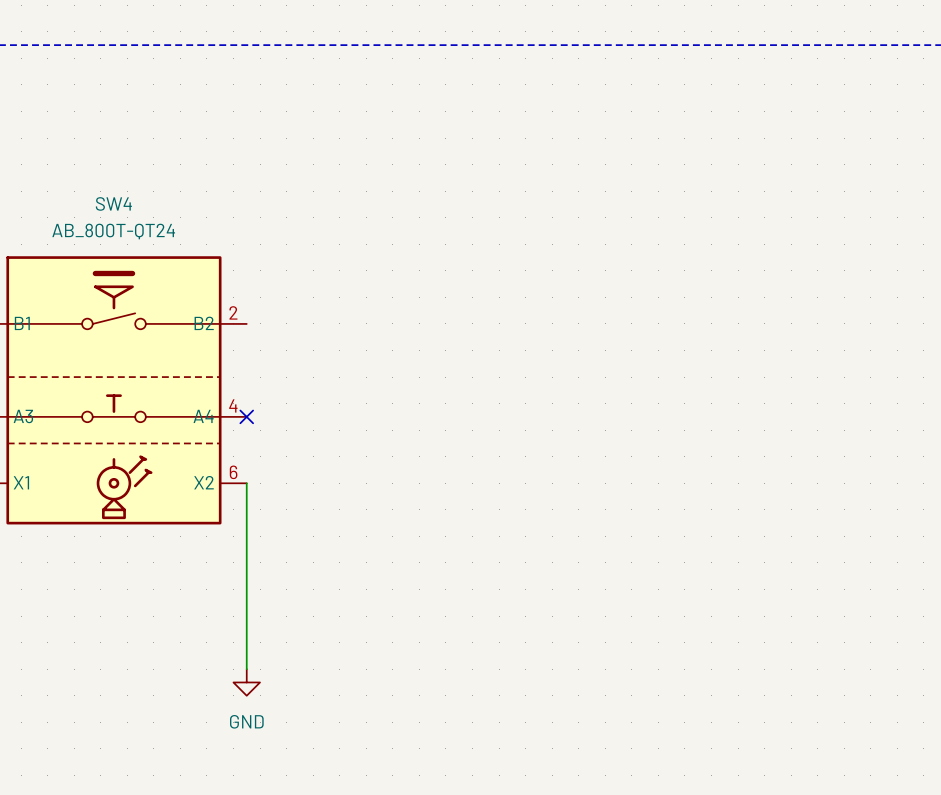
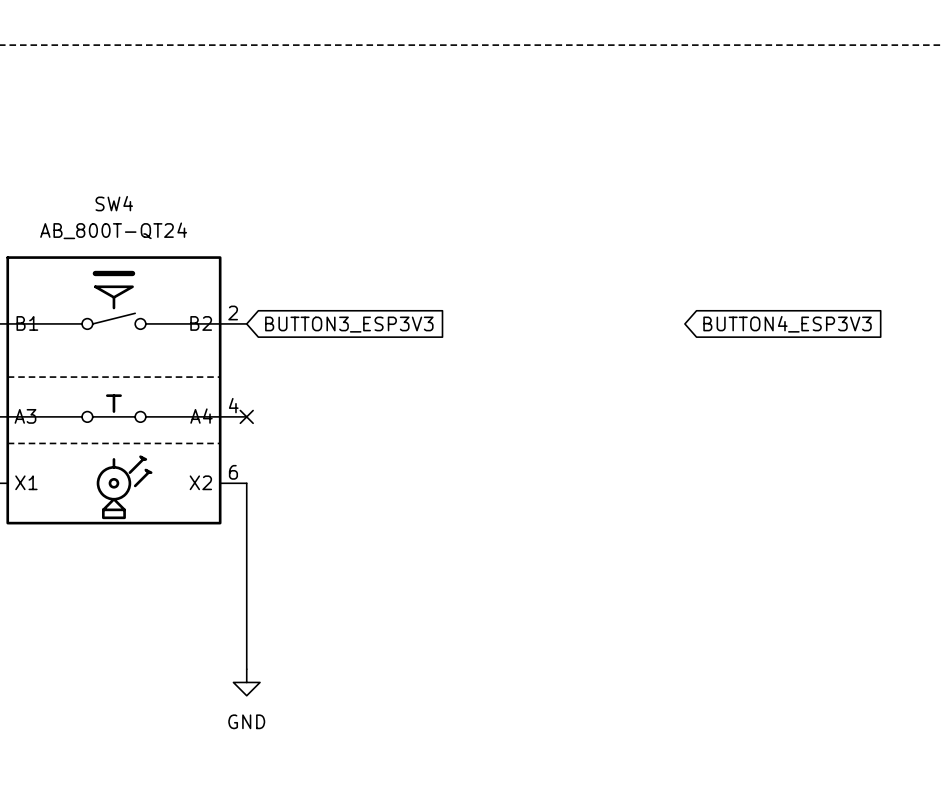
global label: none -> BUTTON3_ESP3V3 (349, 324)
global label: none -> BUTTON4_ESP3V3 (787, 324)

